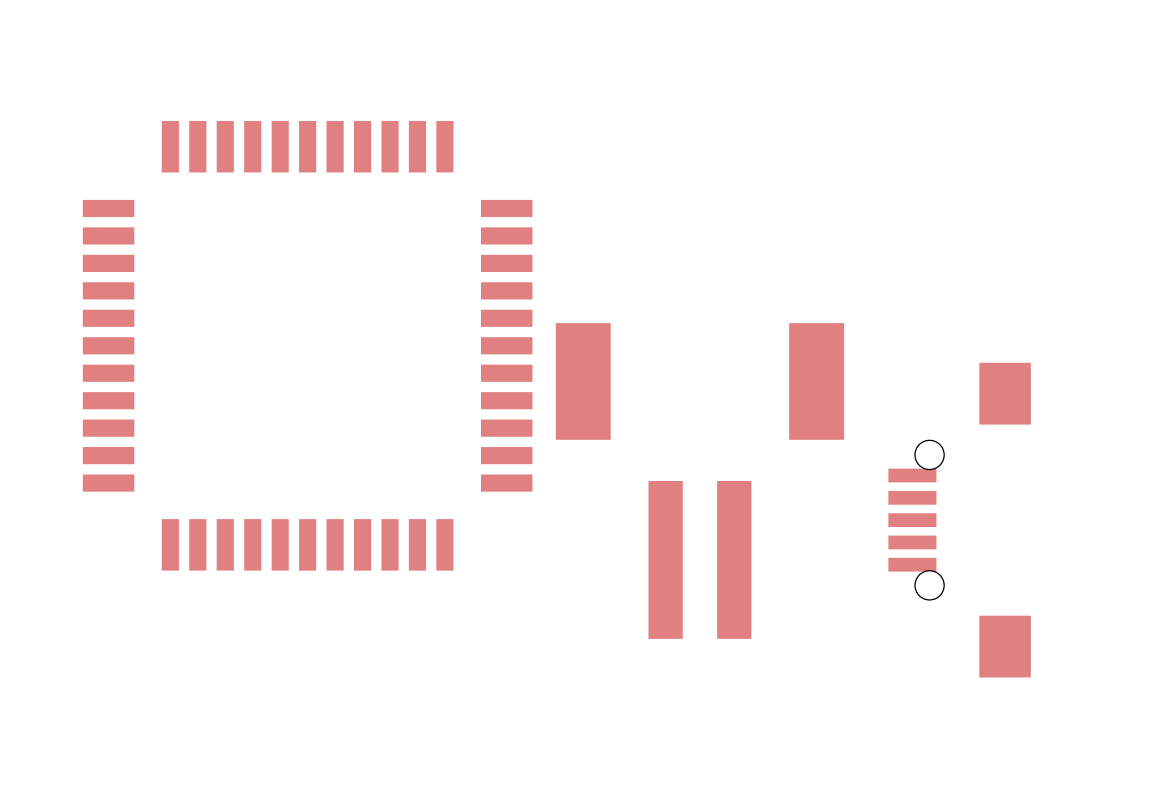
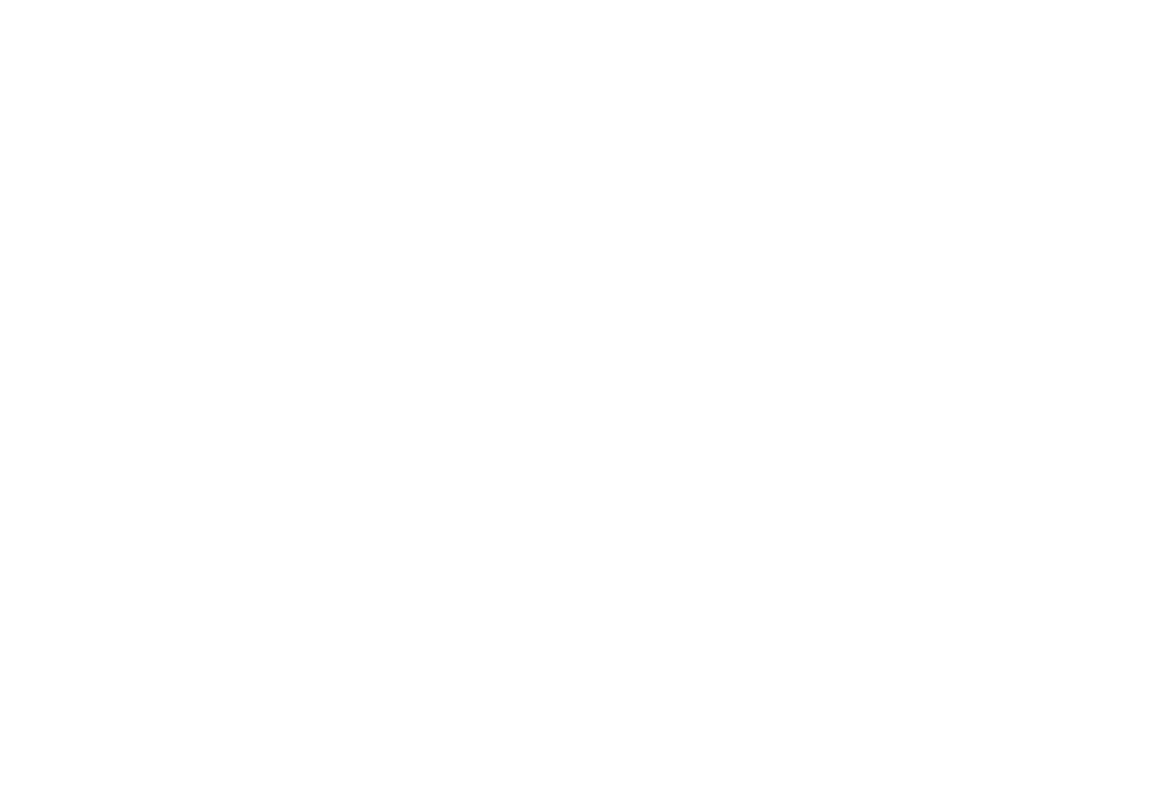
part: (307, 345) -> none
part: (699, 481) -> none
part: (959, 520) -> none

